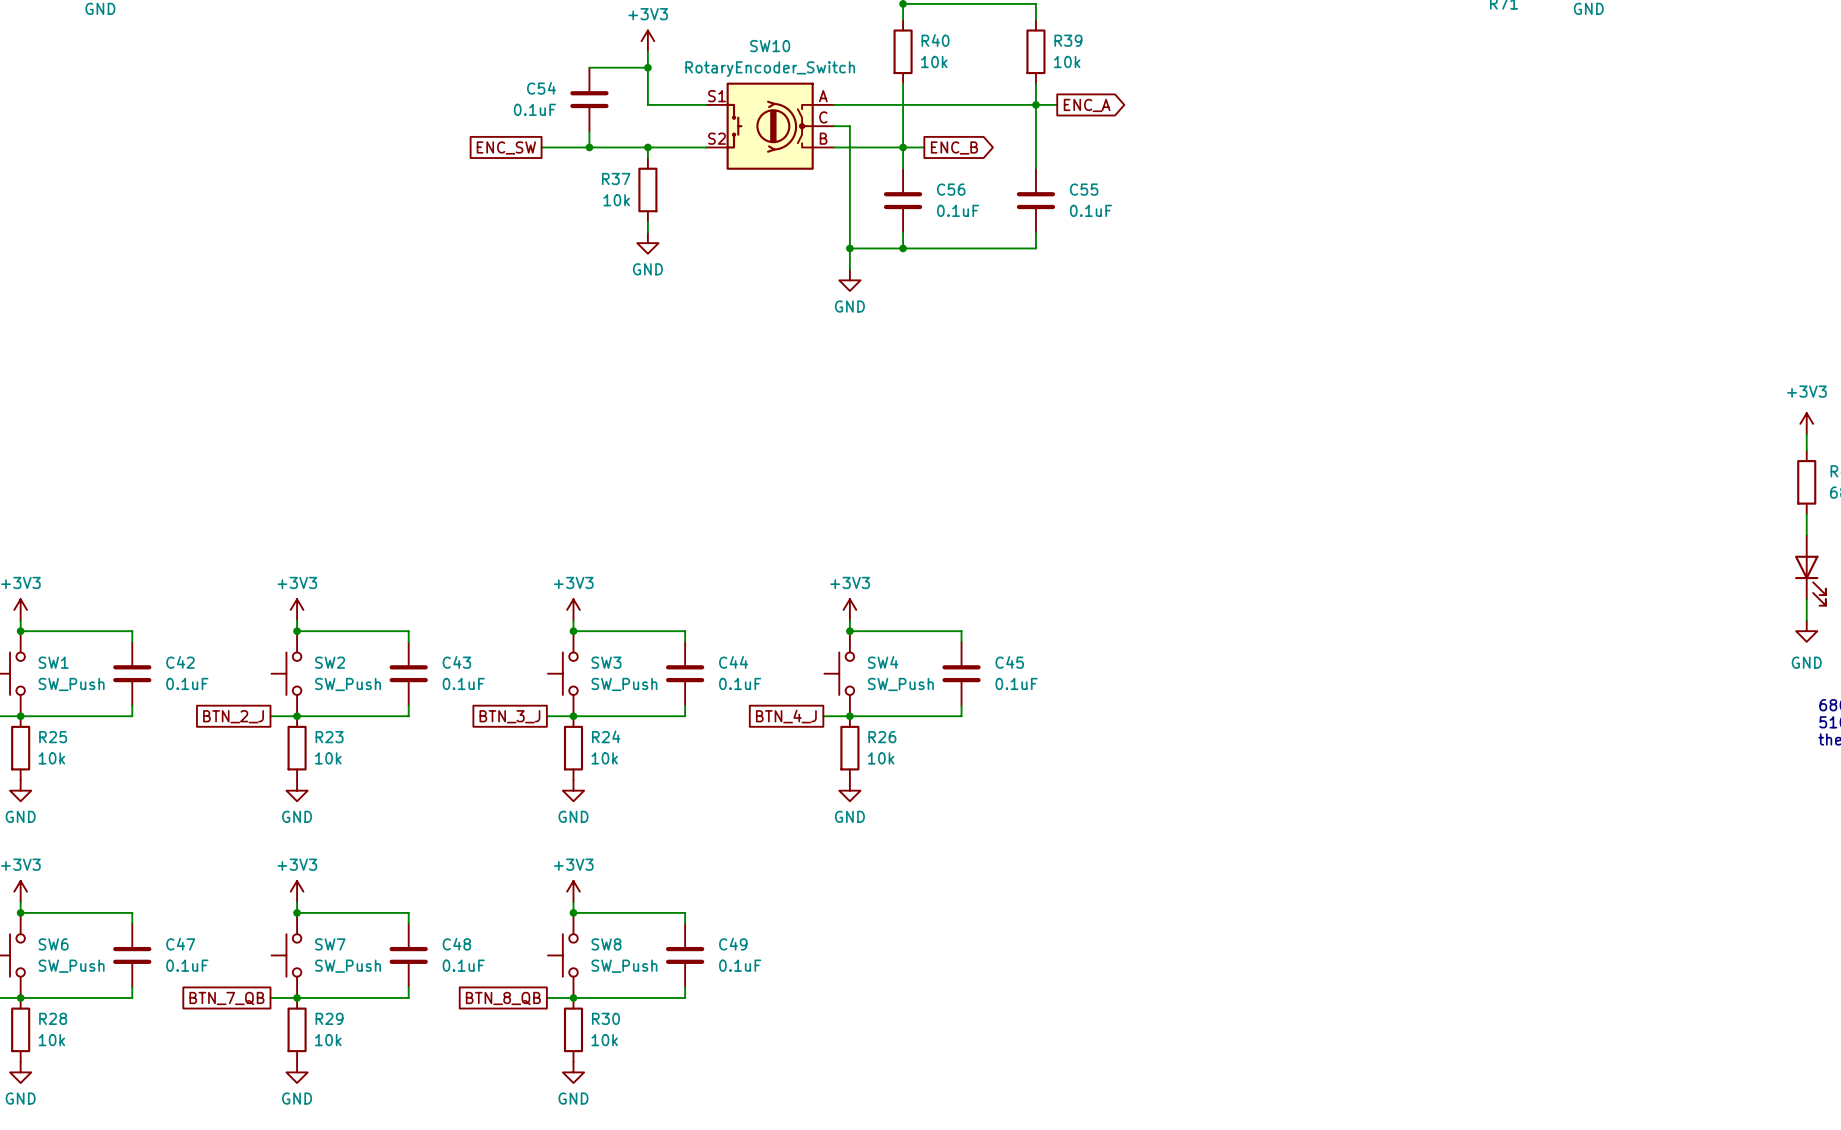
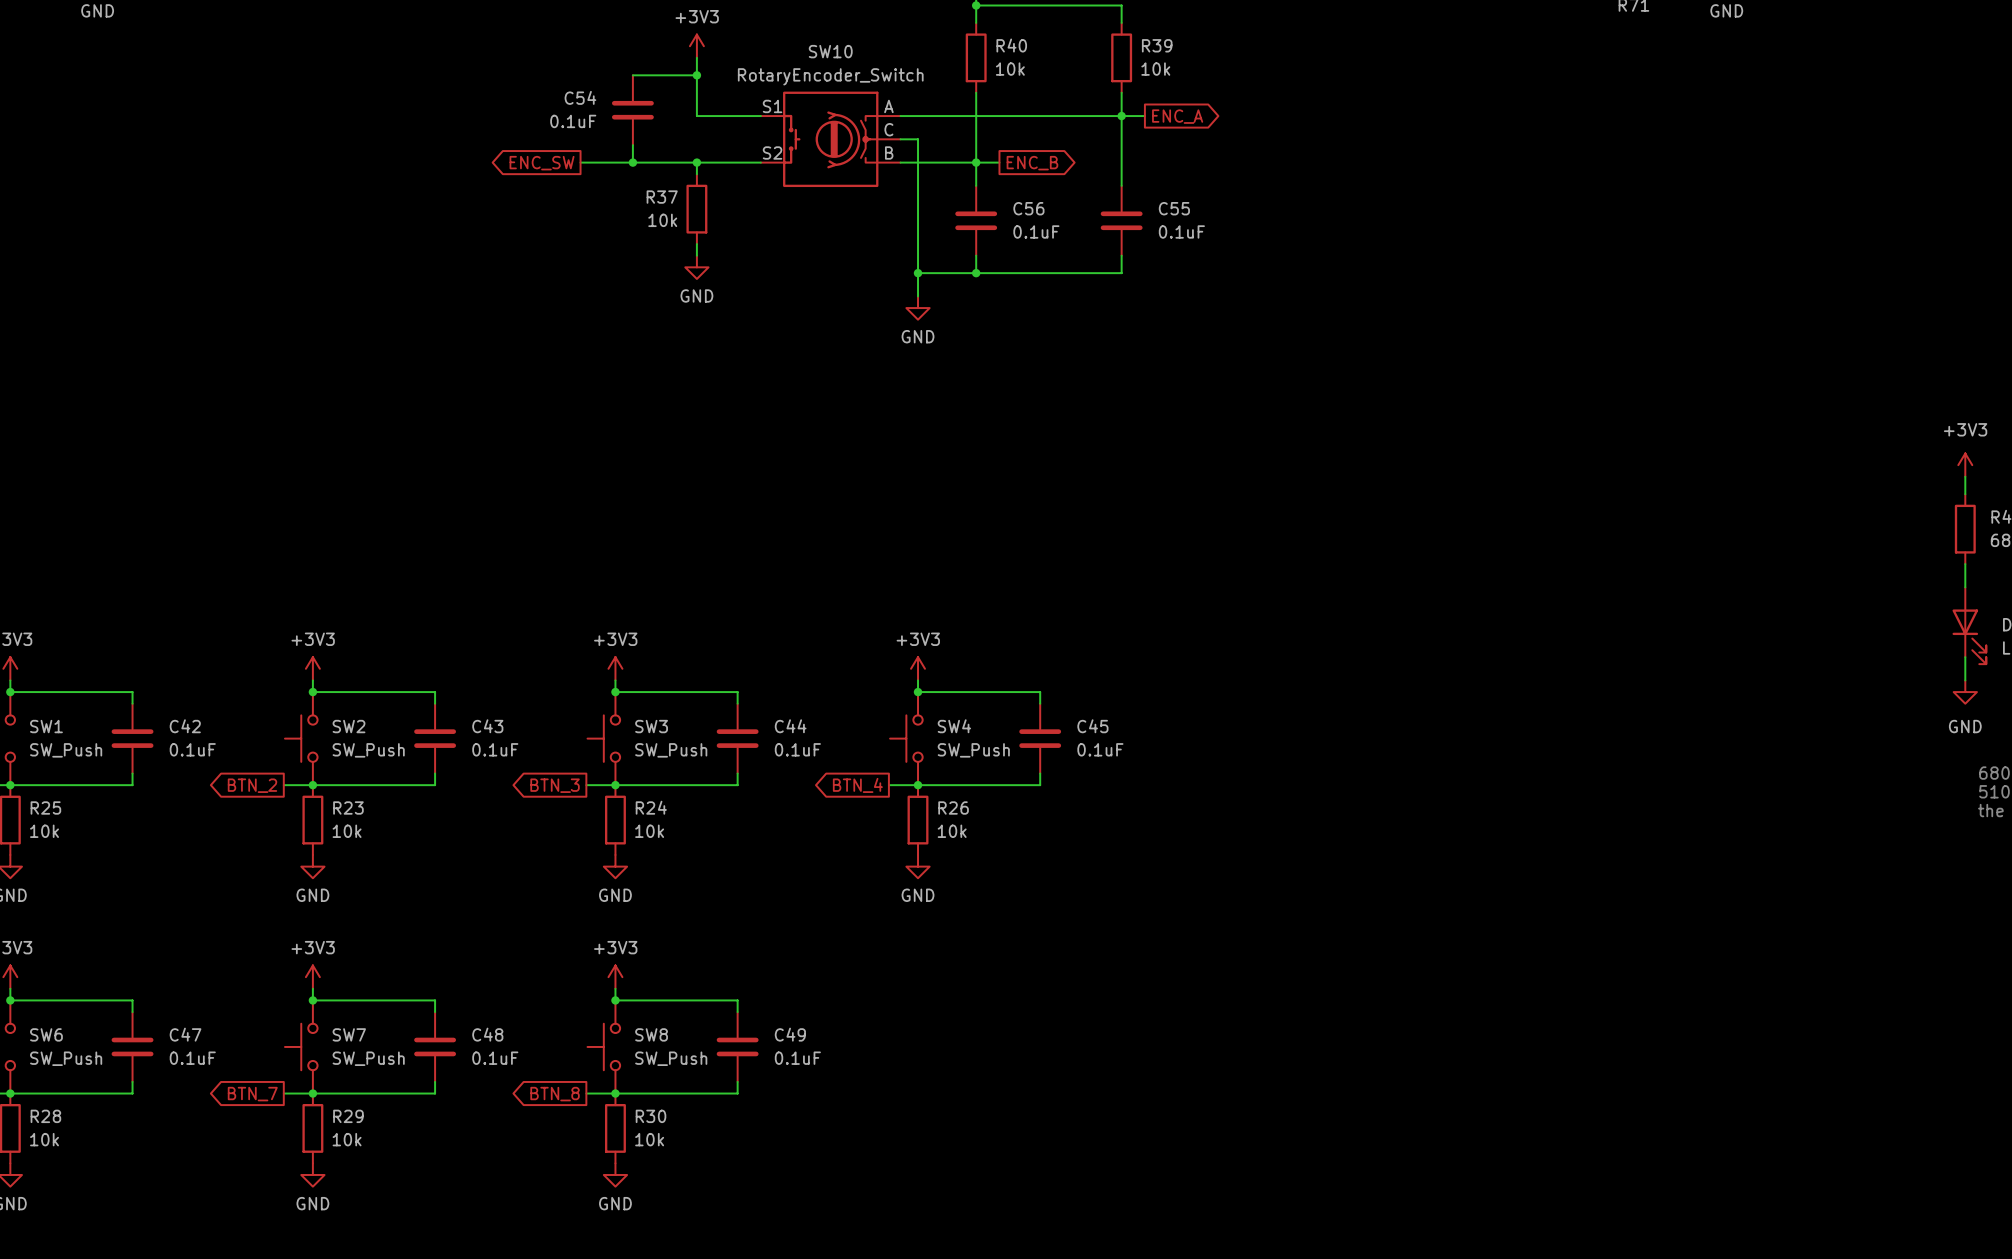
global label shape: passive (506, 147) -> output (542, 163)
global label shape: passive (233, 716) -> output (252, 785)
global label: BTN_2_J (233, 716) -> BTN_2 (252, 785)
global label shape: passive (509, 716) -> output (555, 785)
global label: BTN_3_J (509, 716) -> BTN_3 (555, 785)
global label shape: passive (786, 716) -> output (857, 785)
global label: BTN_4_J (786, 716) -> BTN_4 (857, 785)
global label shape: passive (226, 998) -> output (252, 1094)
global label: BTN_7_QB (226, 998) -> BTN_7 (252, 1094)
global label shape: passive (503, 998) -> output (555, 1094)
global label: BTN_8_QB (503, 998) -> BTN_8 (555, 1094)

